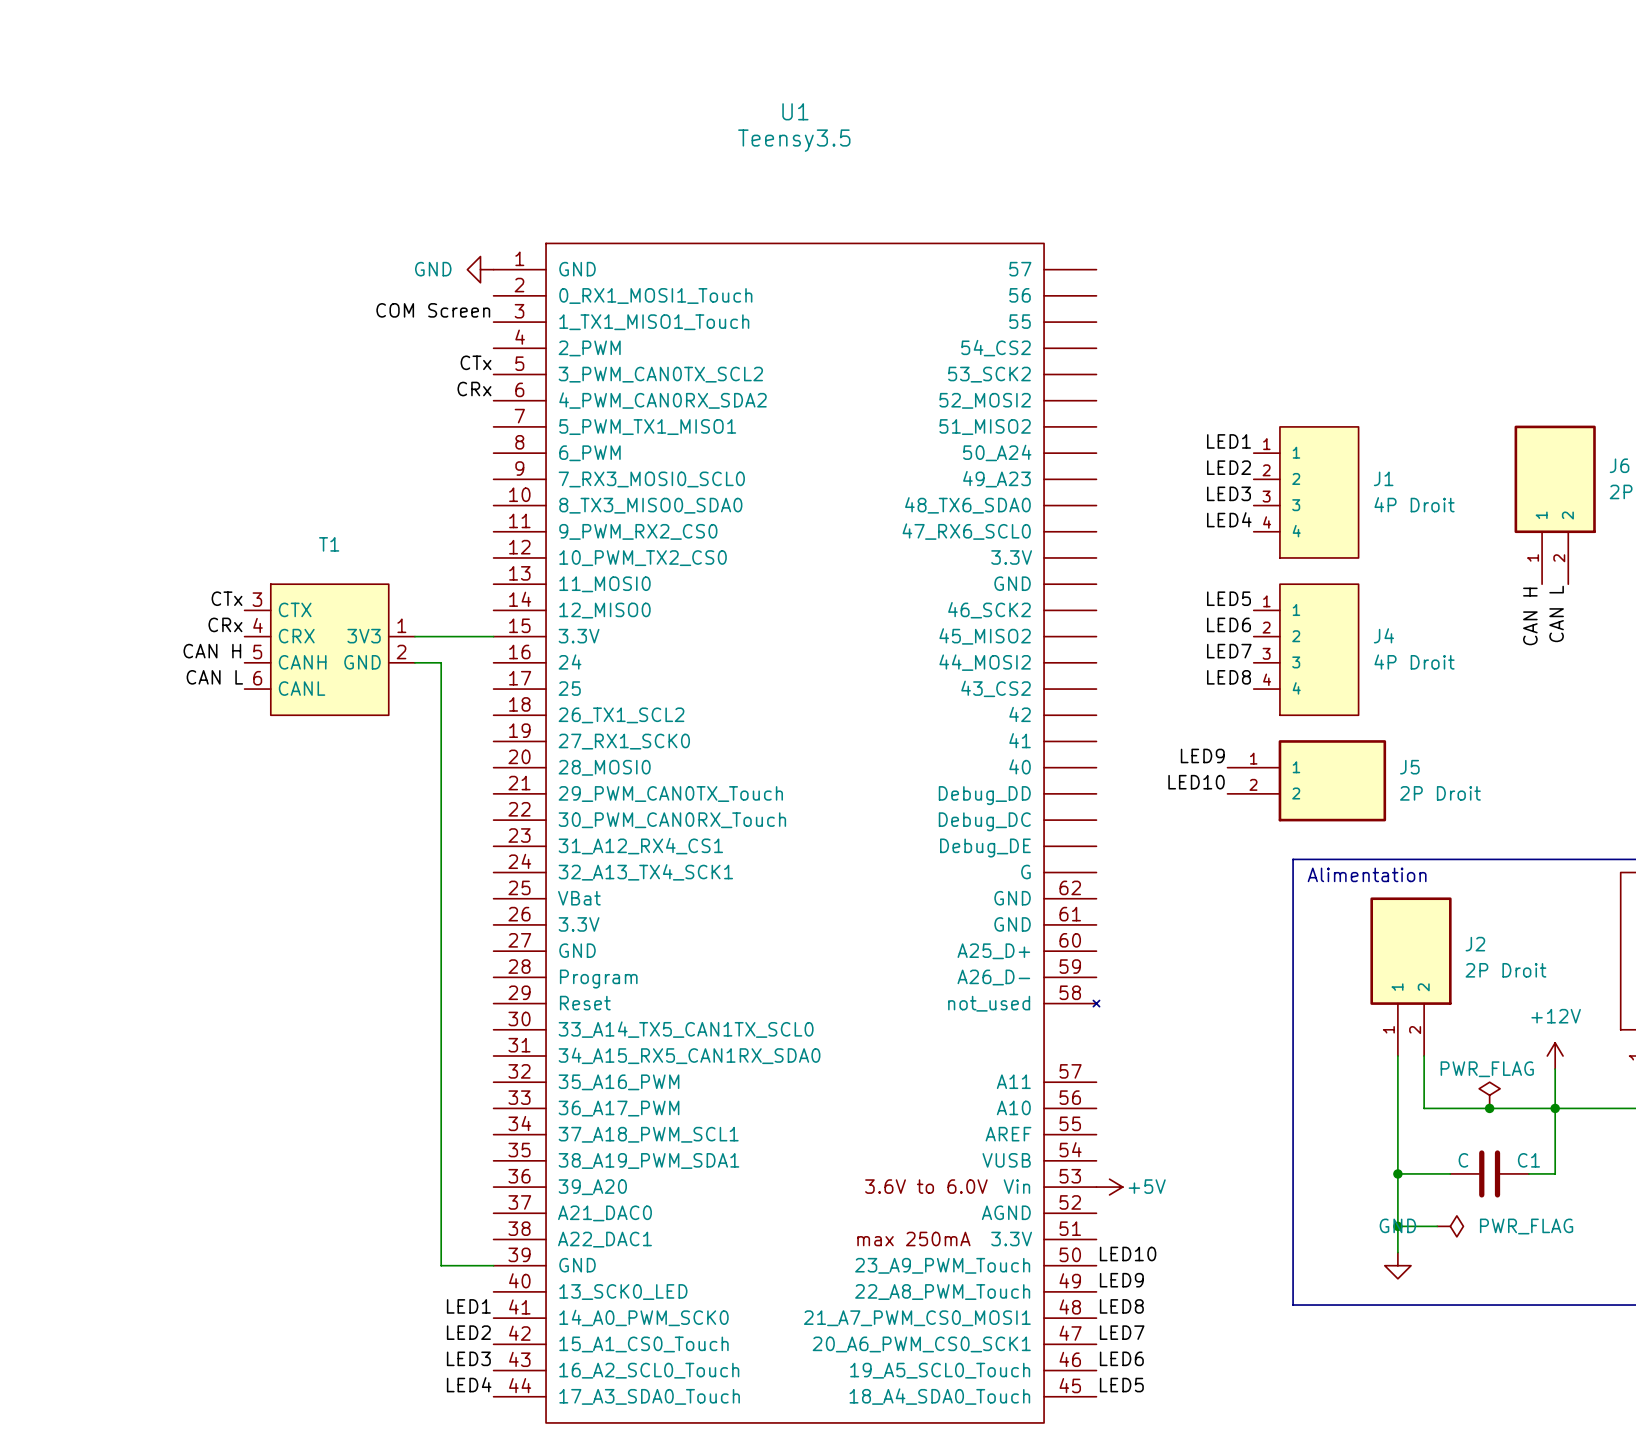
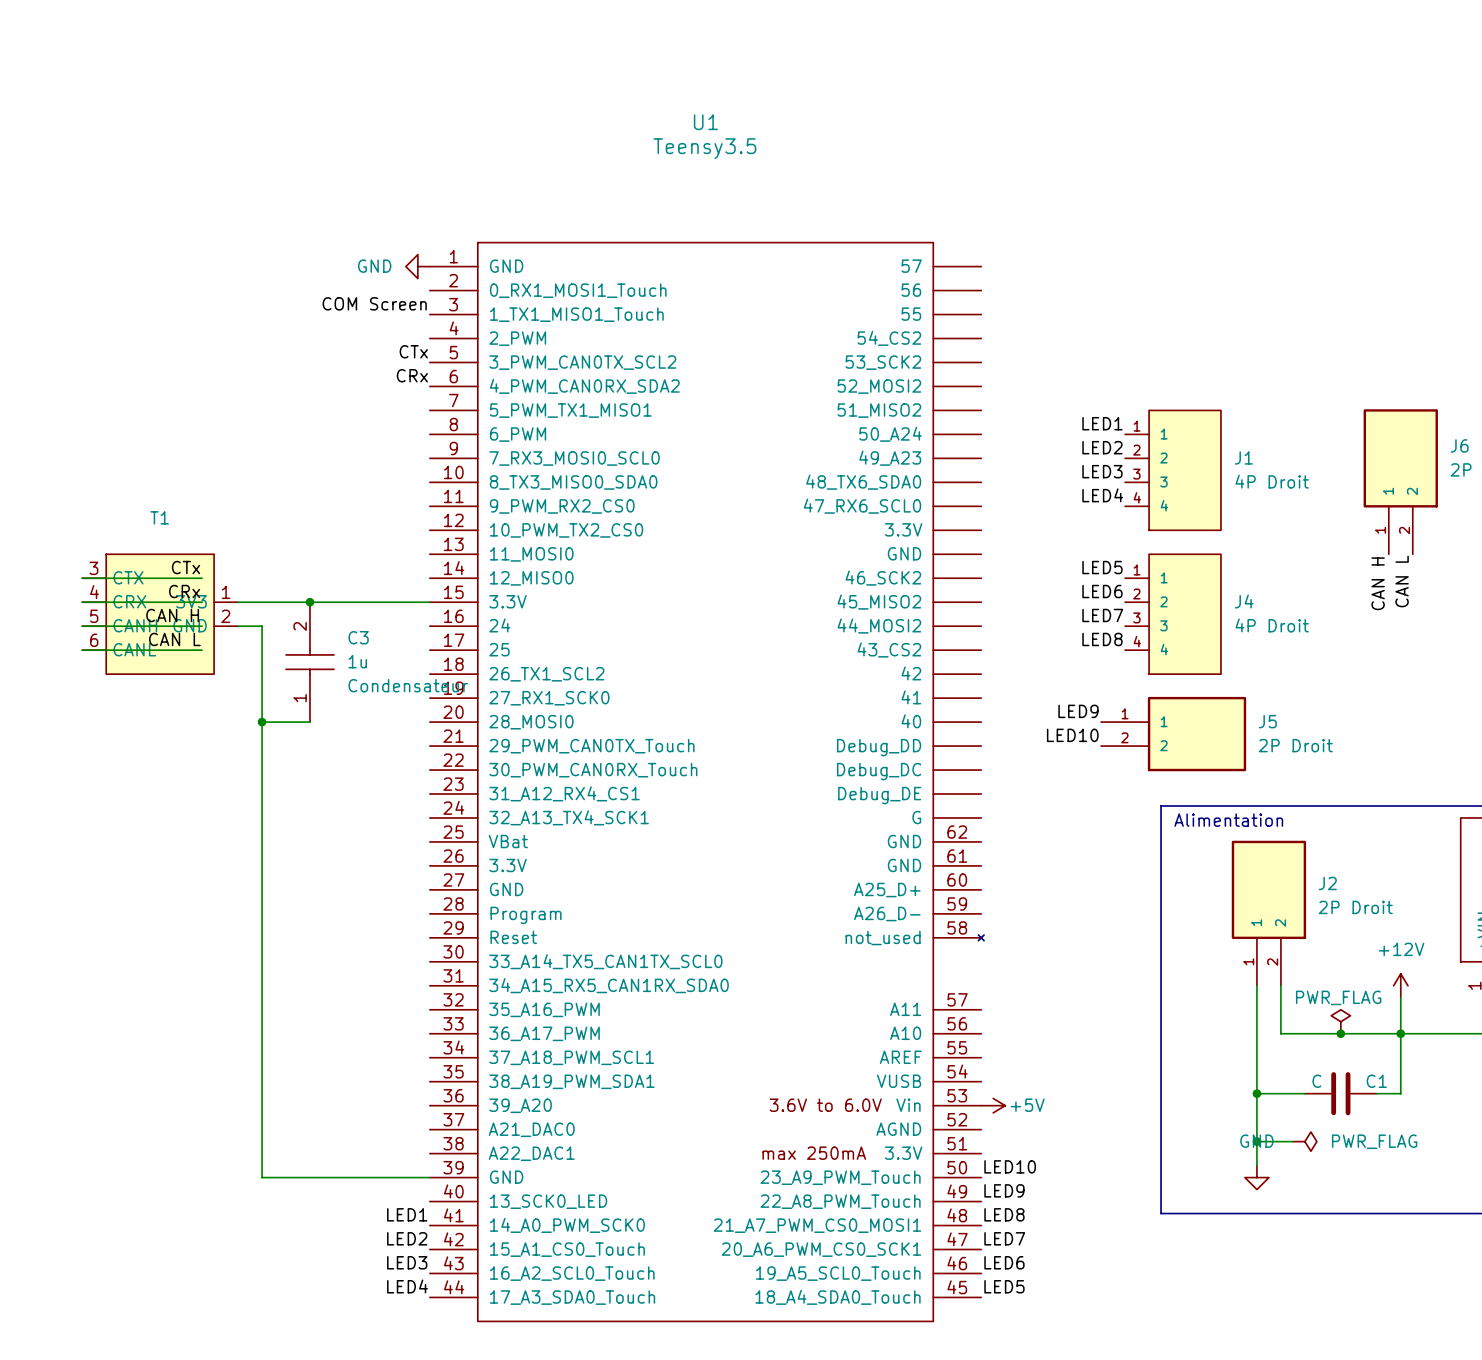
wire: none -> (82, 578) (202, 578)
wire: none -> (82, 602) (202, 602)
junction: none -> (309, 602)
T1 position: (329, 649) -> (160, 614)
wire: none -> (82, 626) (202, 626)
wire: (414, 662) (441, 662) (441, 1265) -> (238, 626) (262, 626) (262, 1177) (381, 1177)
wire: none -> (82, 650) (202, 650)
C3: none -> 1u (309, 662)
wire: none -> (262, 722) (309, 722)
junction: none -> (262, 722)

